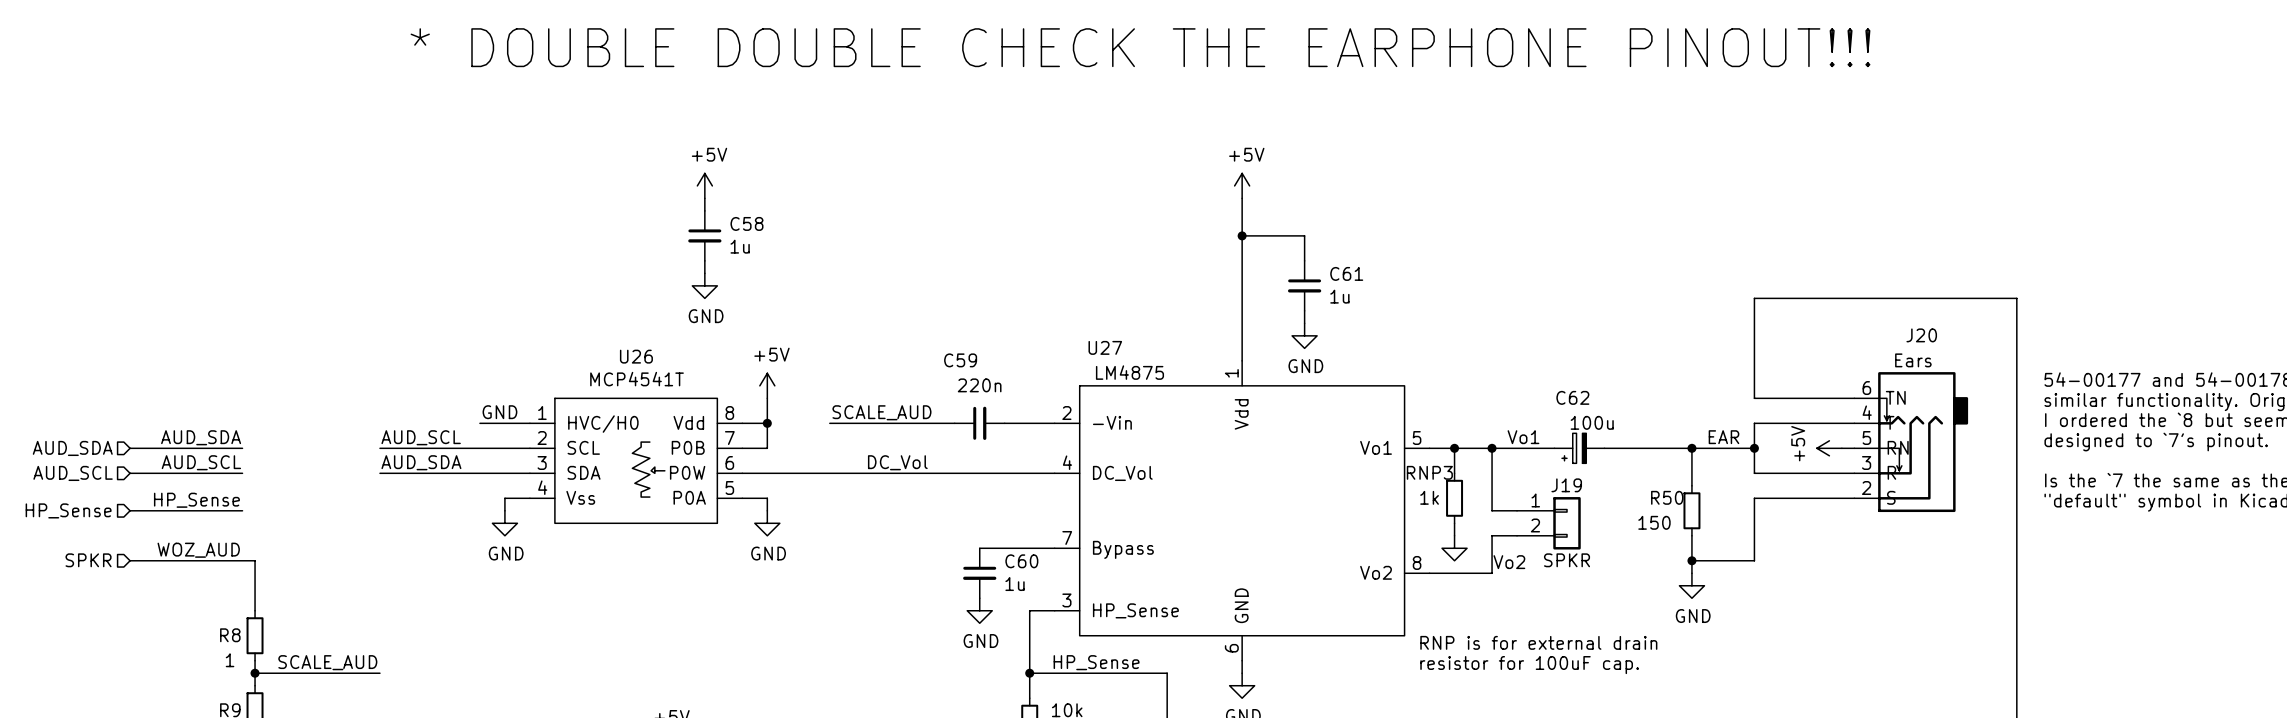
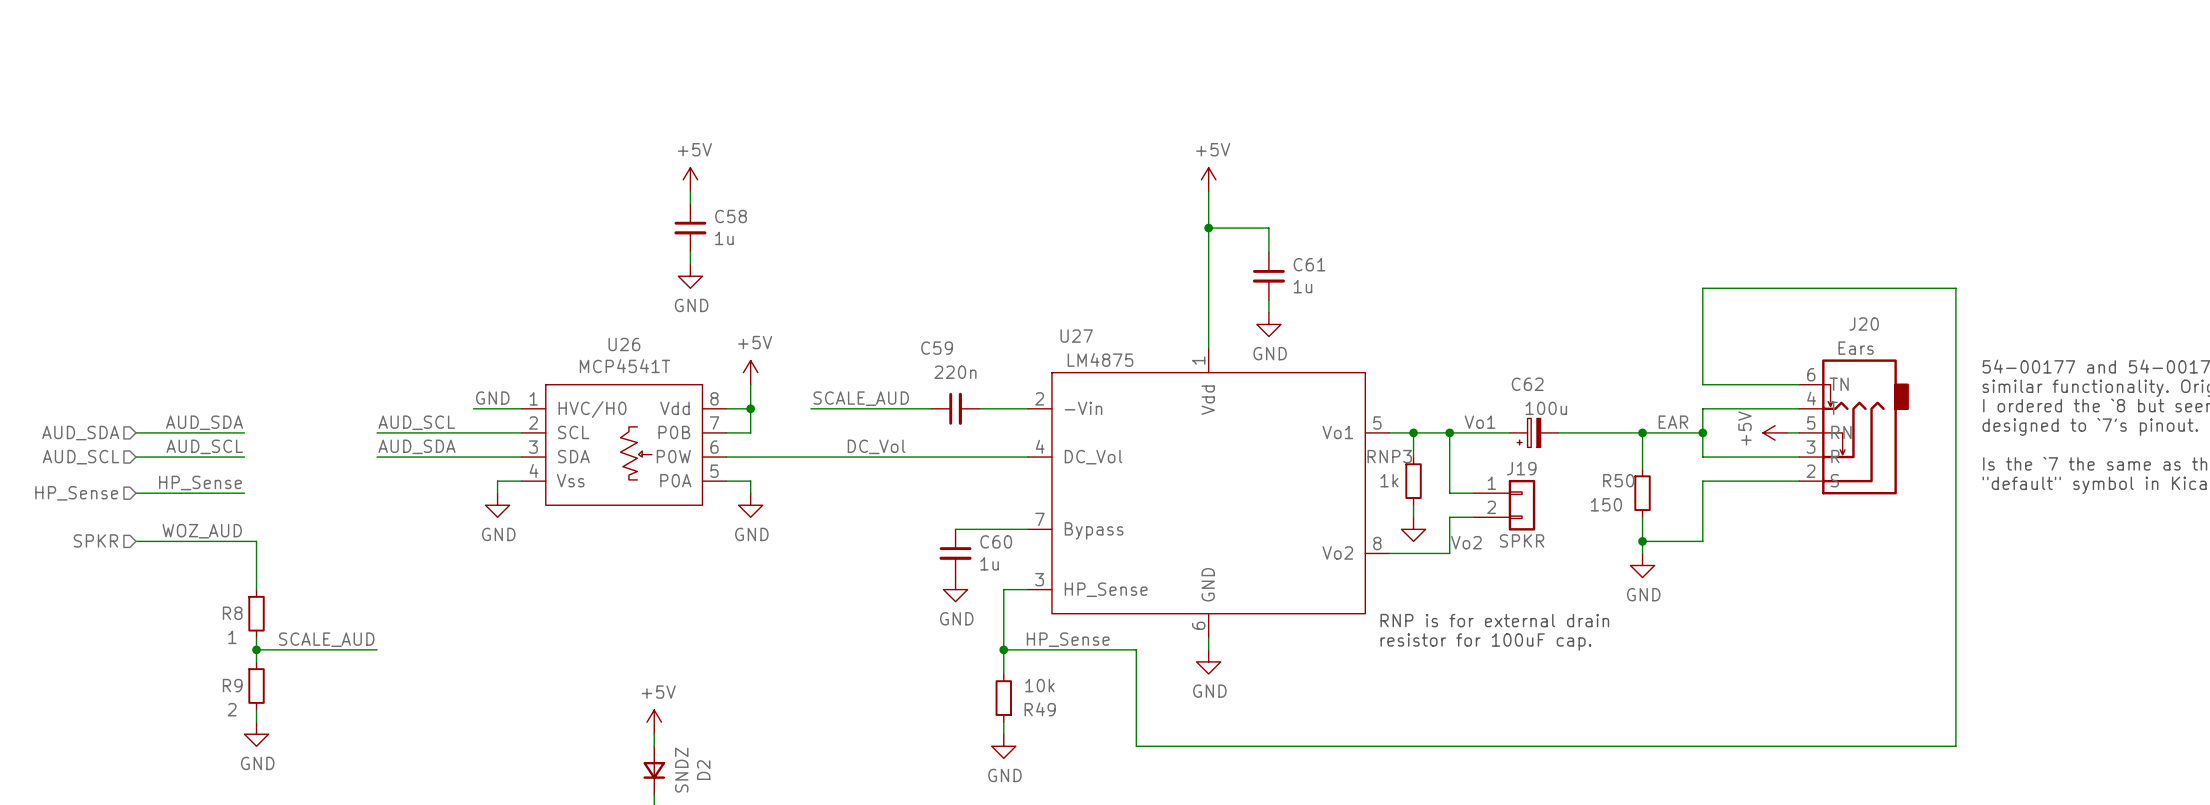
text: * DOUBLE DOUBLE CHECK THE EARPHONE PINOUT!!! (1140, 47) -> none

